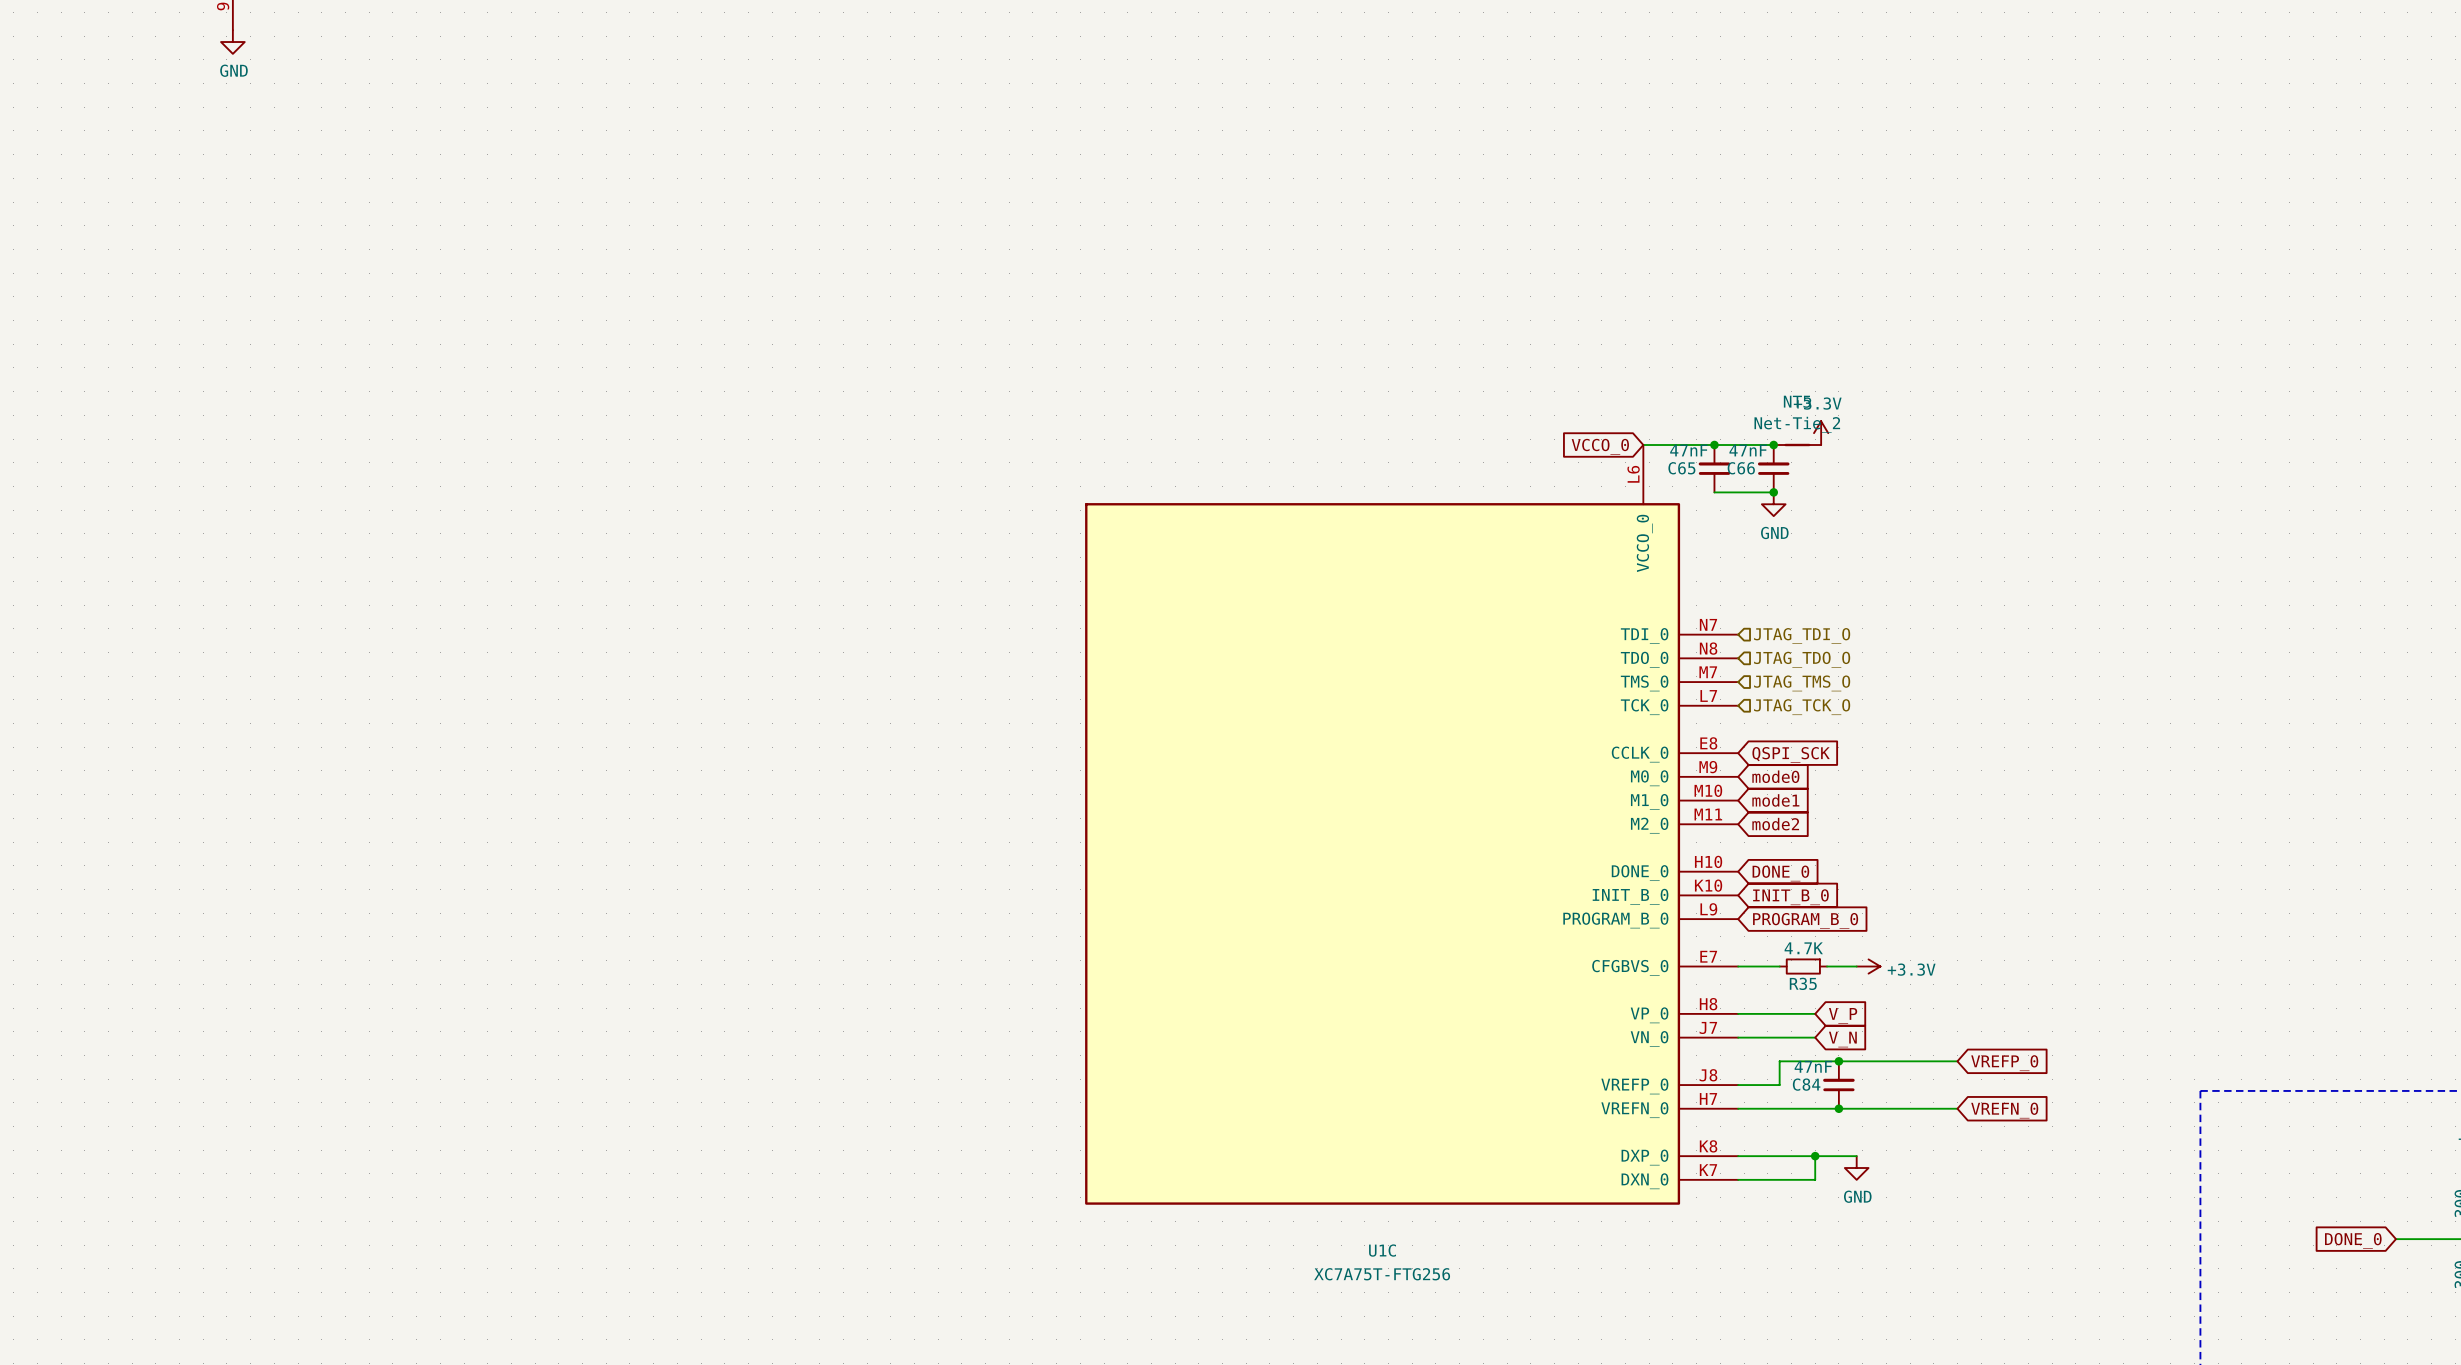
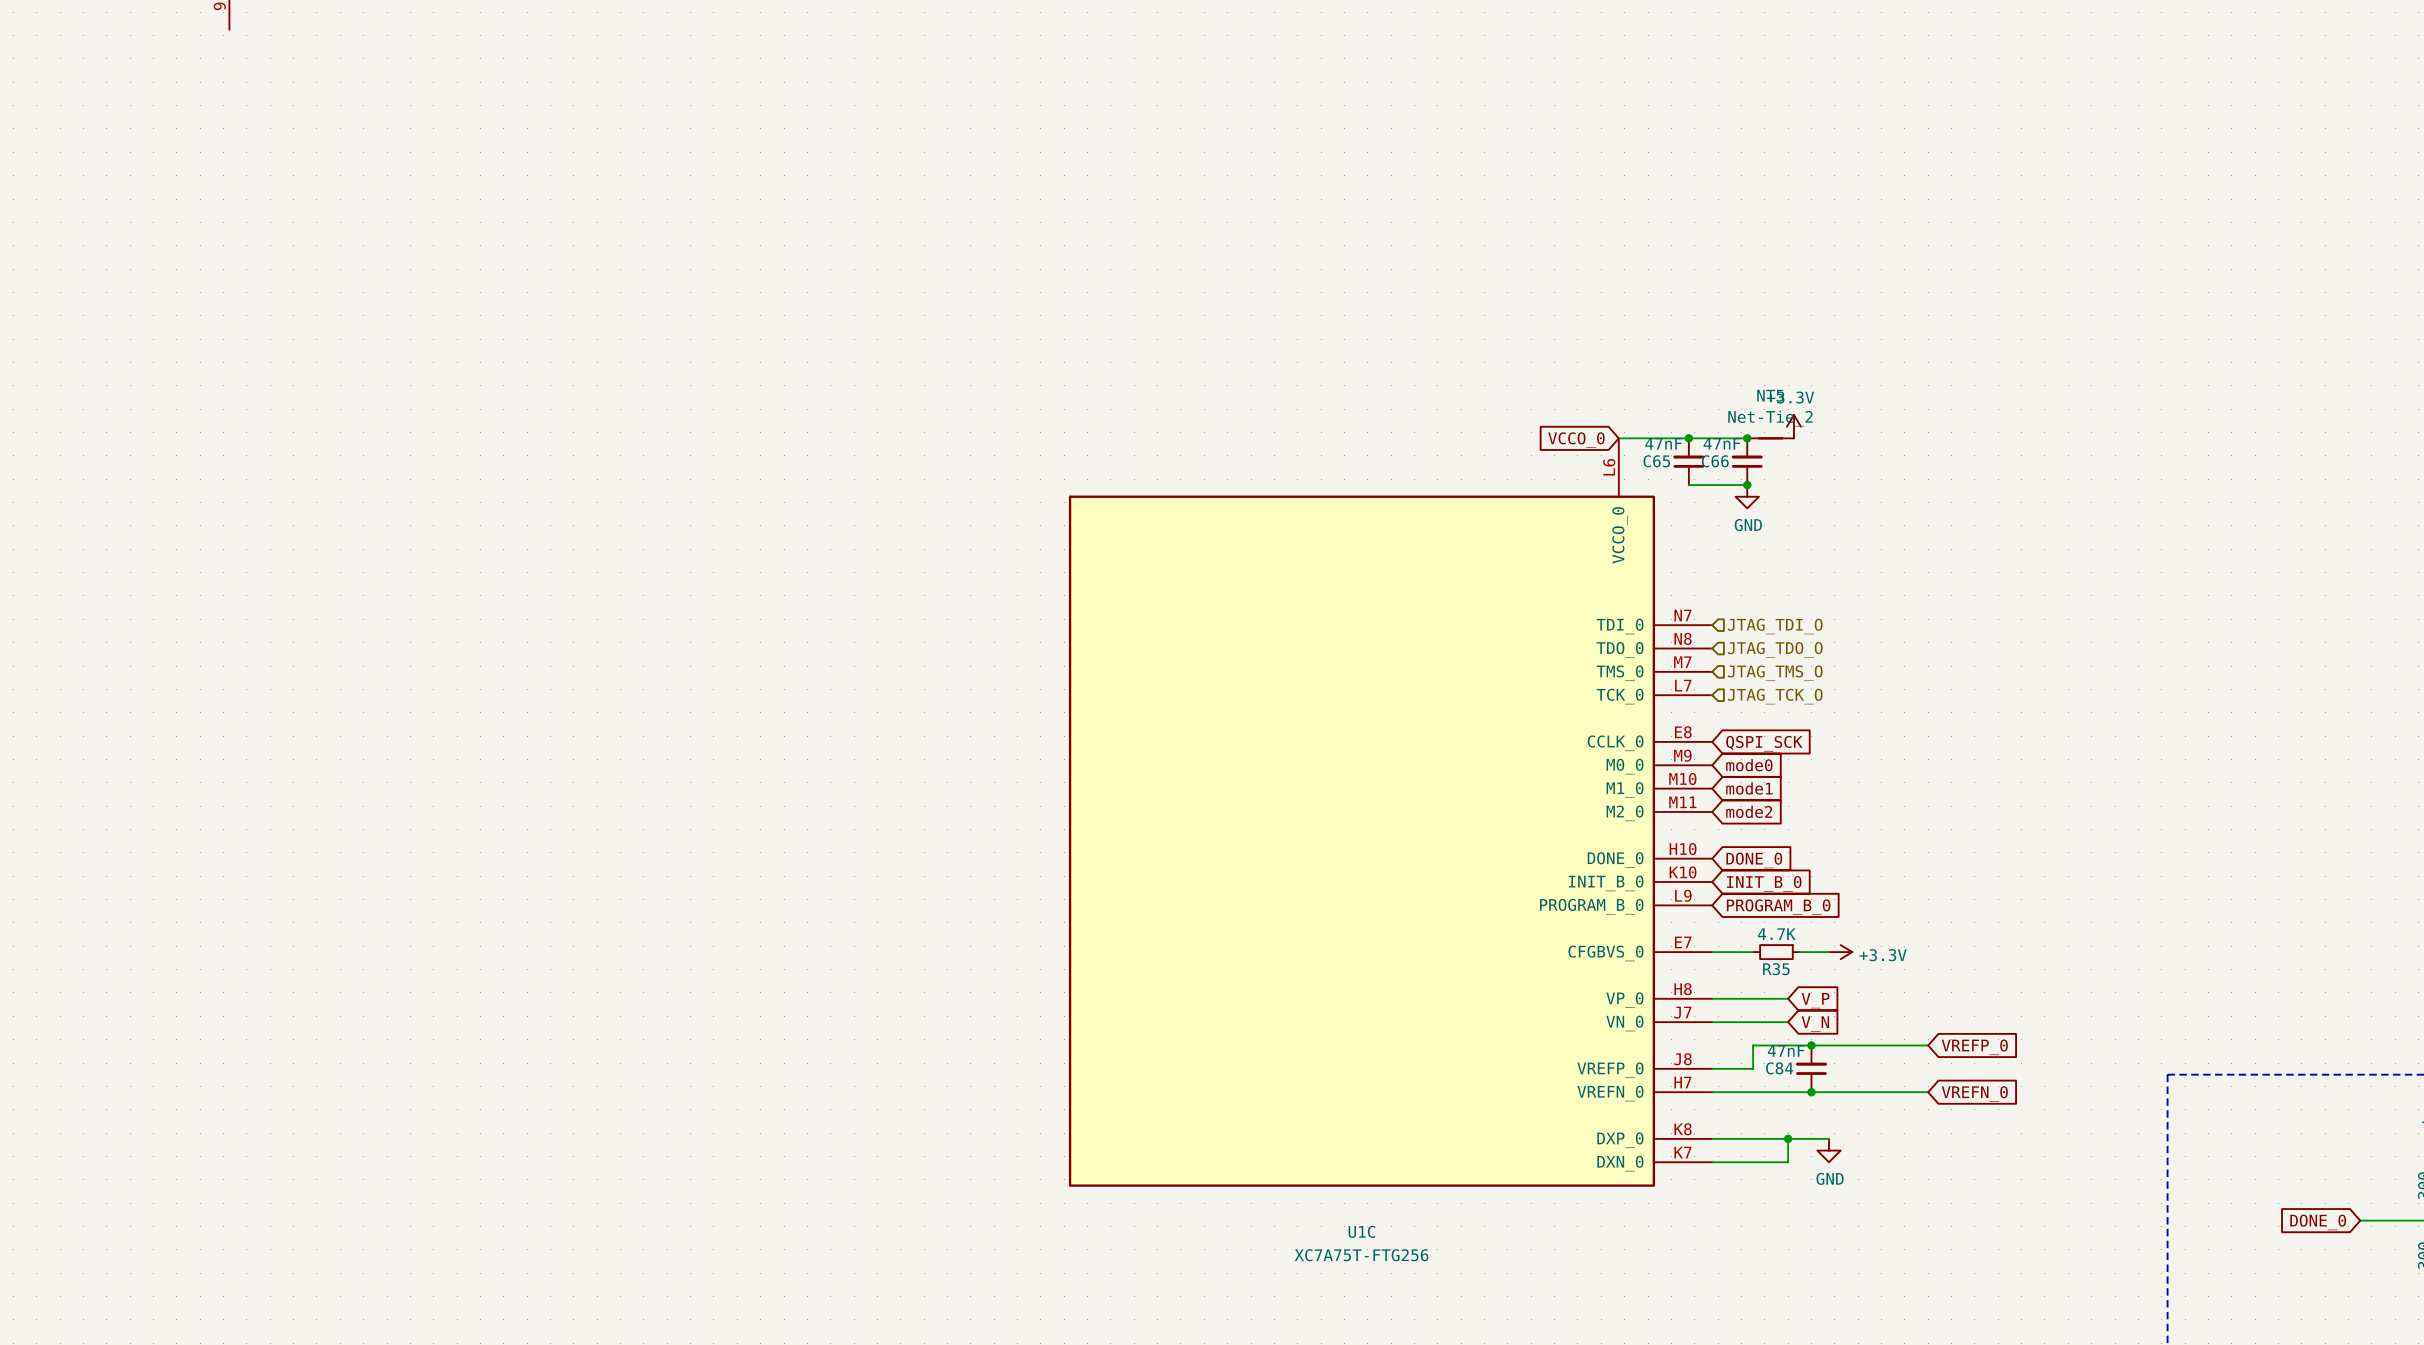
power symbol: GND (232, 42) -> none

